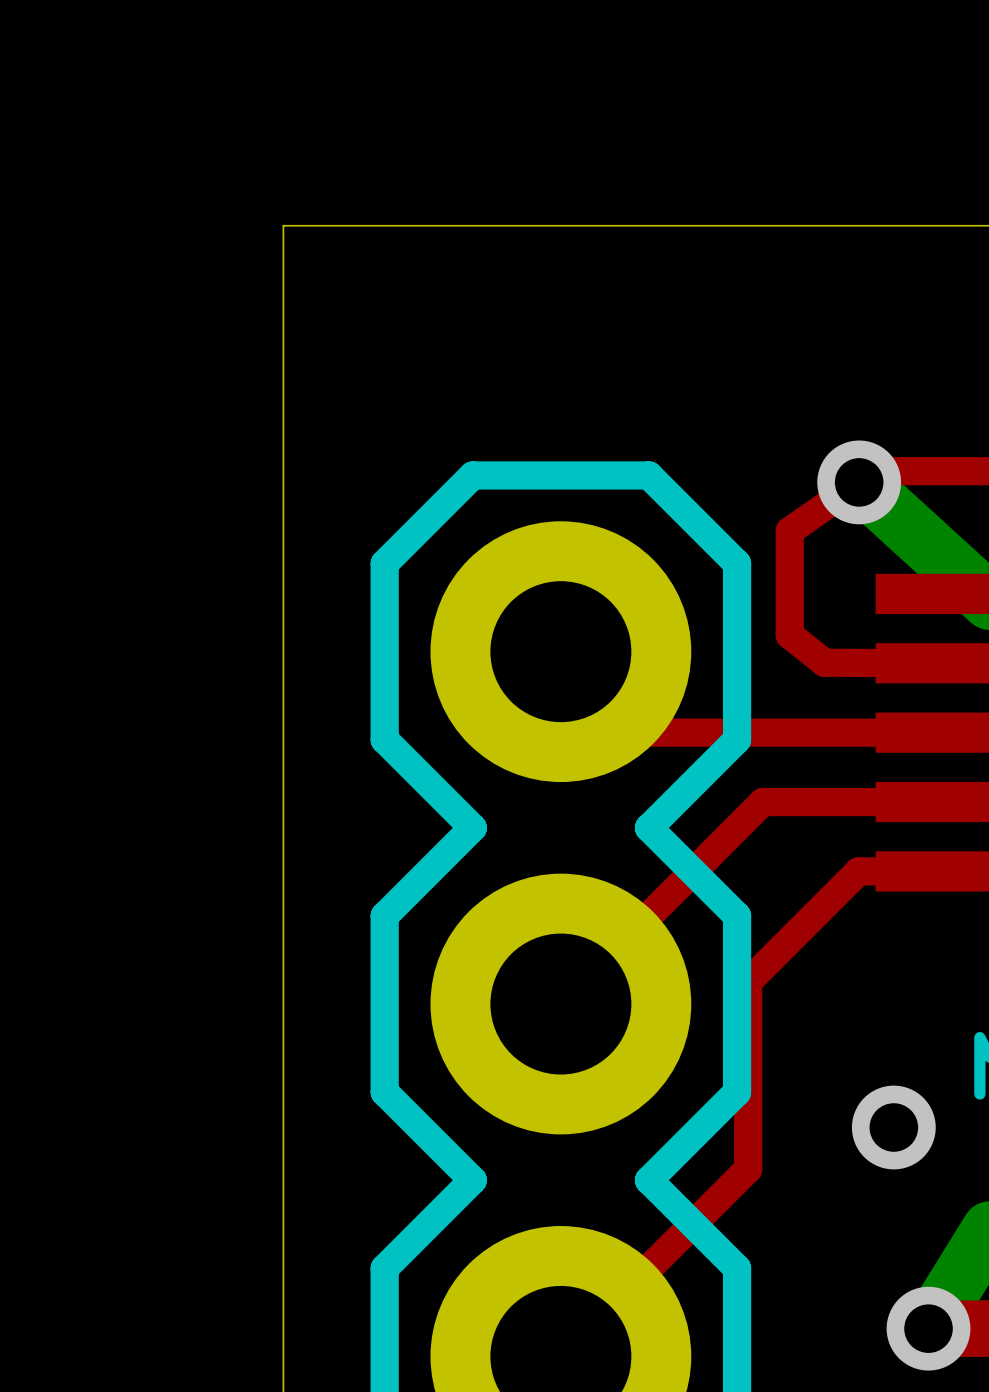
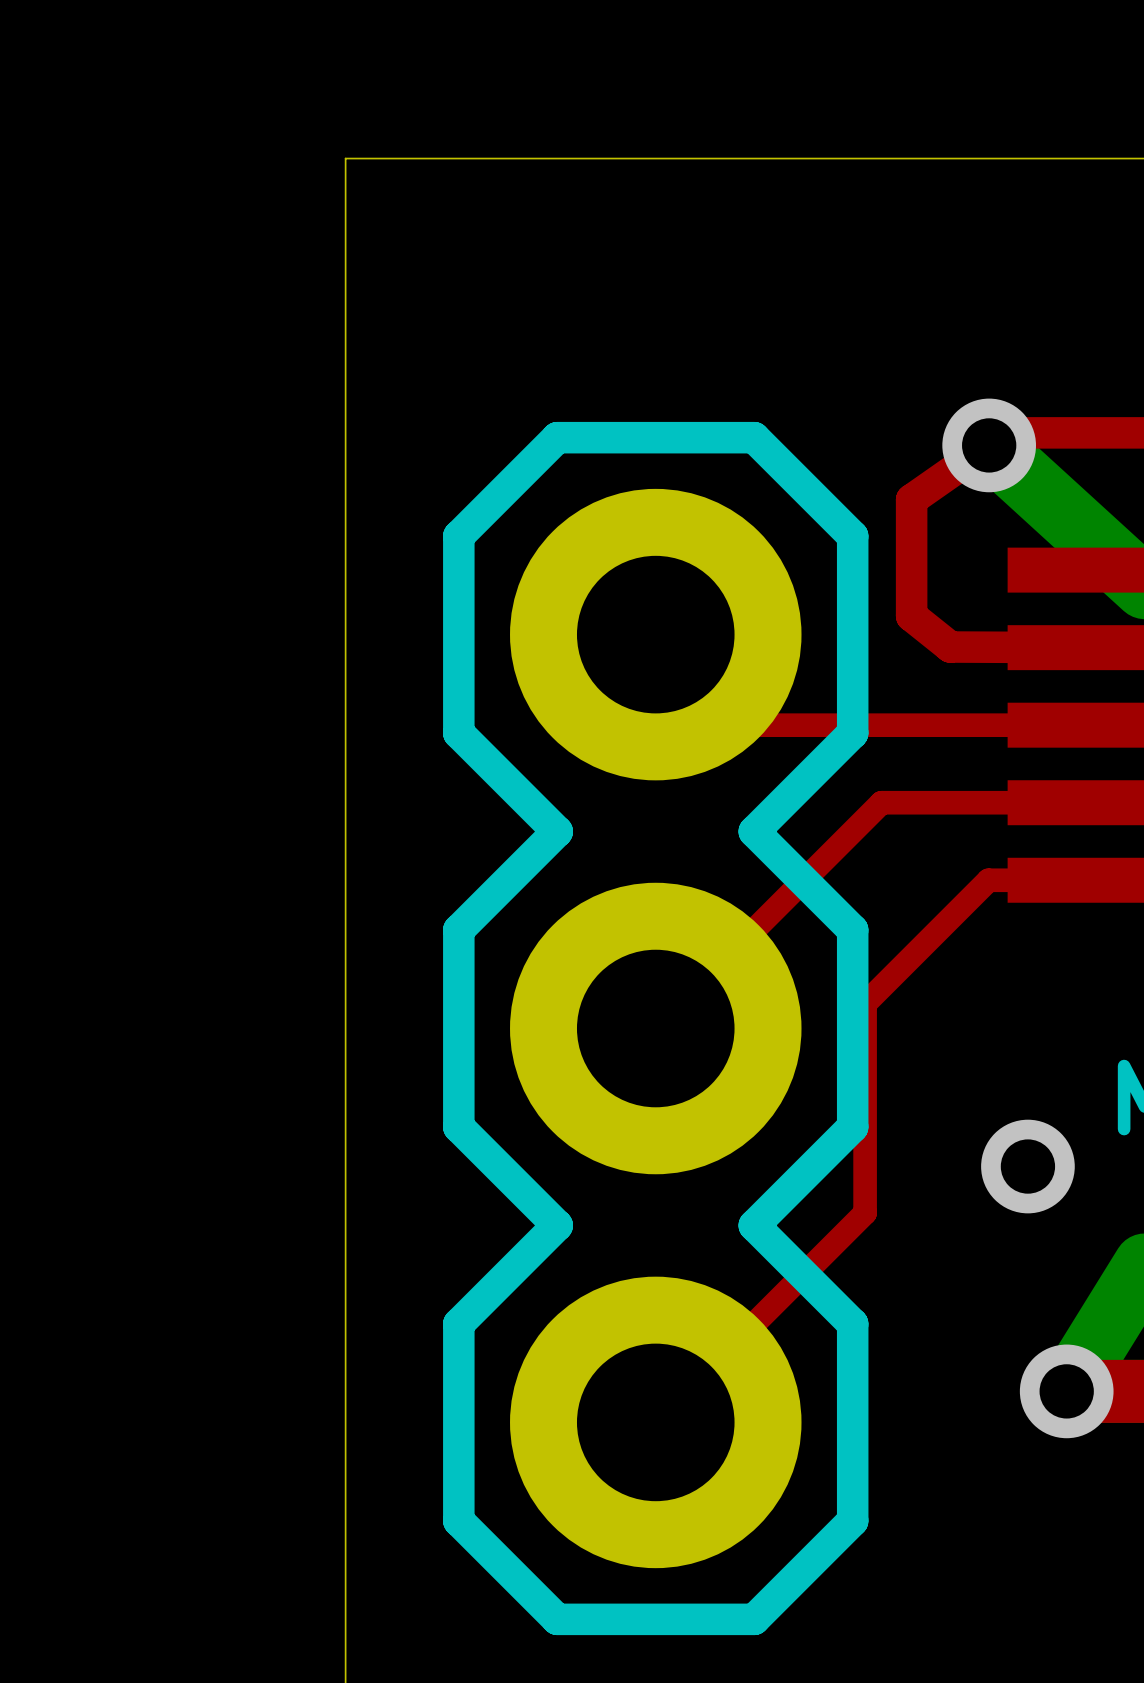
top track width: thick (560, 651) (641, 732) (945, 732) -> thin (655, 634) (746, 725) (1085, 725)
top track width: thick (945, 802) (762, 802) (560, 1004) -> thin (1085, 802) (881, 802) (655, 1028)
top track width: thick (945, 871) (858, 871) (748, 981) (748, 1169) (560, 1356) -> thin (1085, 880) (988, 880) (865, 1003) (865, 1213) (655, 1422)

